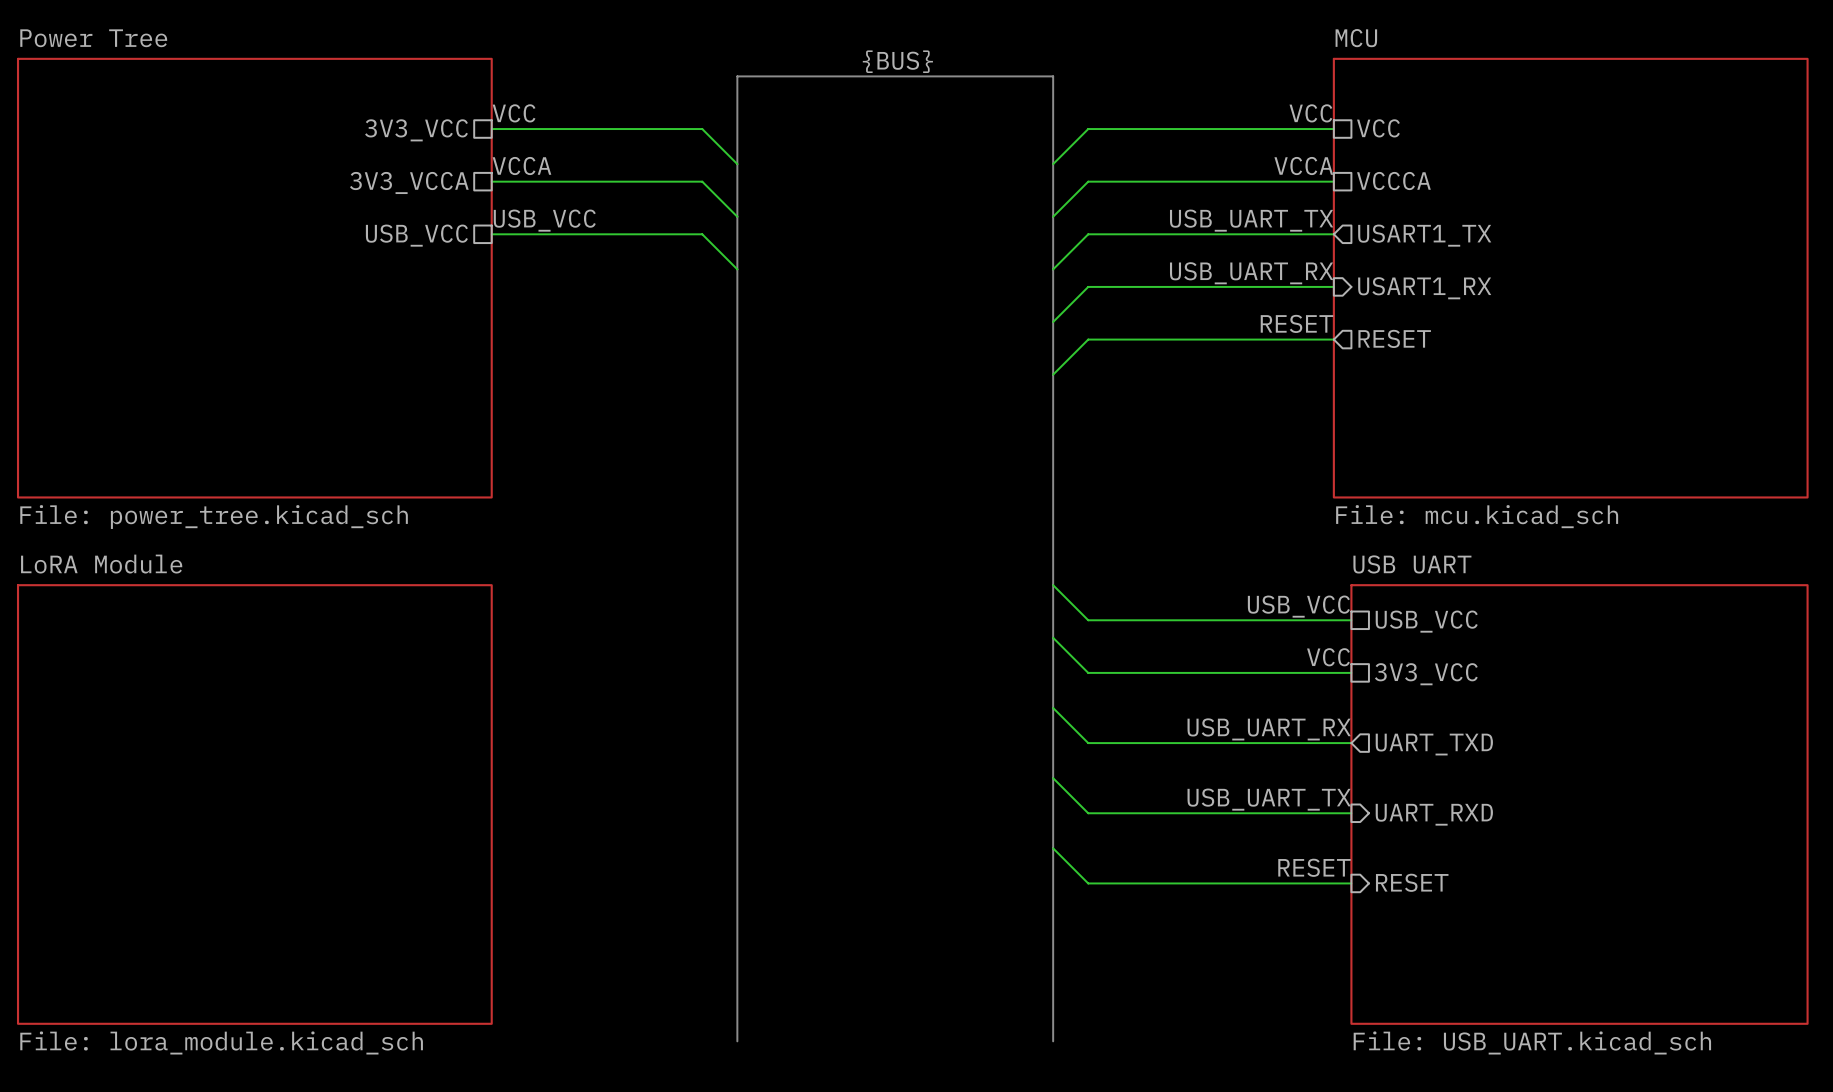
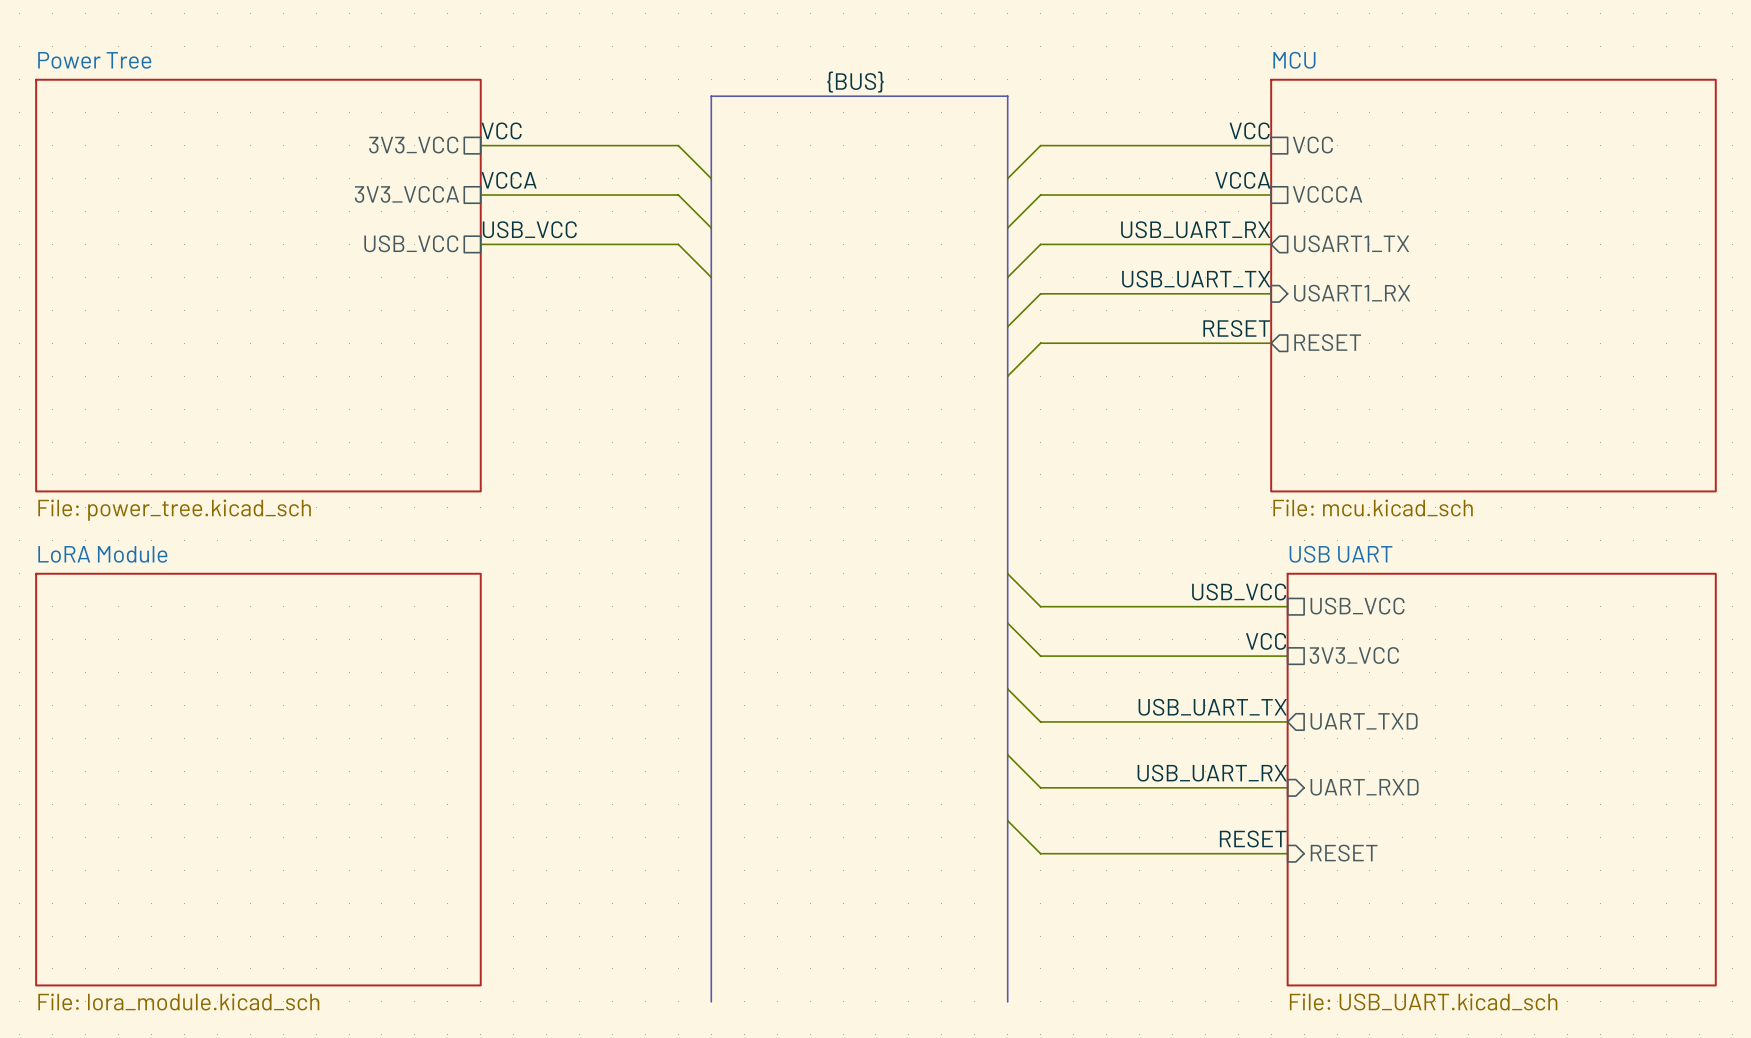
label: USB_UART_TX (1251, 220) -> USB_UART_RX (1195, 229)
label: USB_UART_RX (1251, 273) -> USB_UART_TX (1196, 279)
label: USB_UART_RX (1269, 729) -> USB_UART_TX (1212, 707)
label: USB_UART_TX (1269, 799) -> USB_UART_RX (1212, 773)

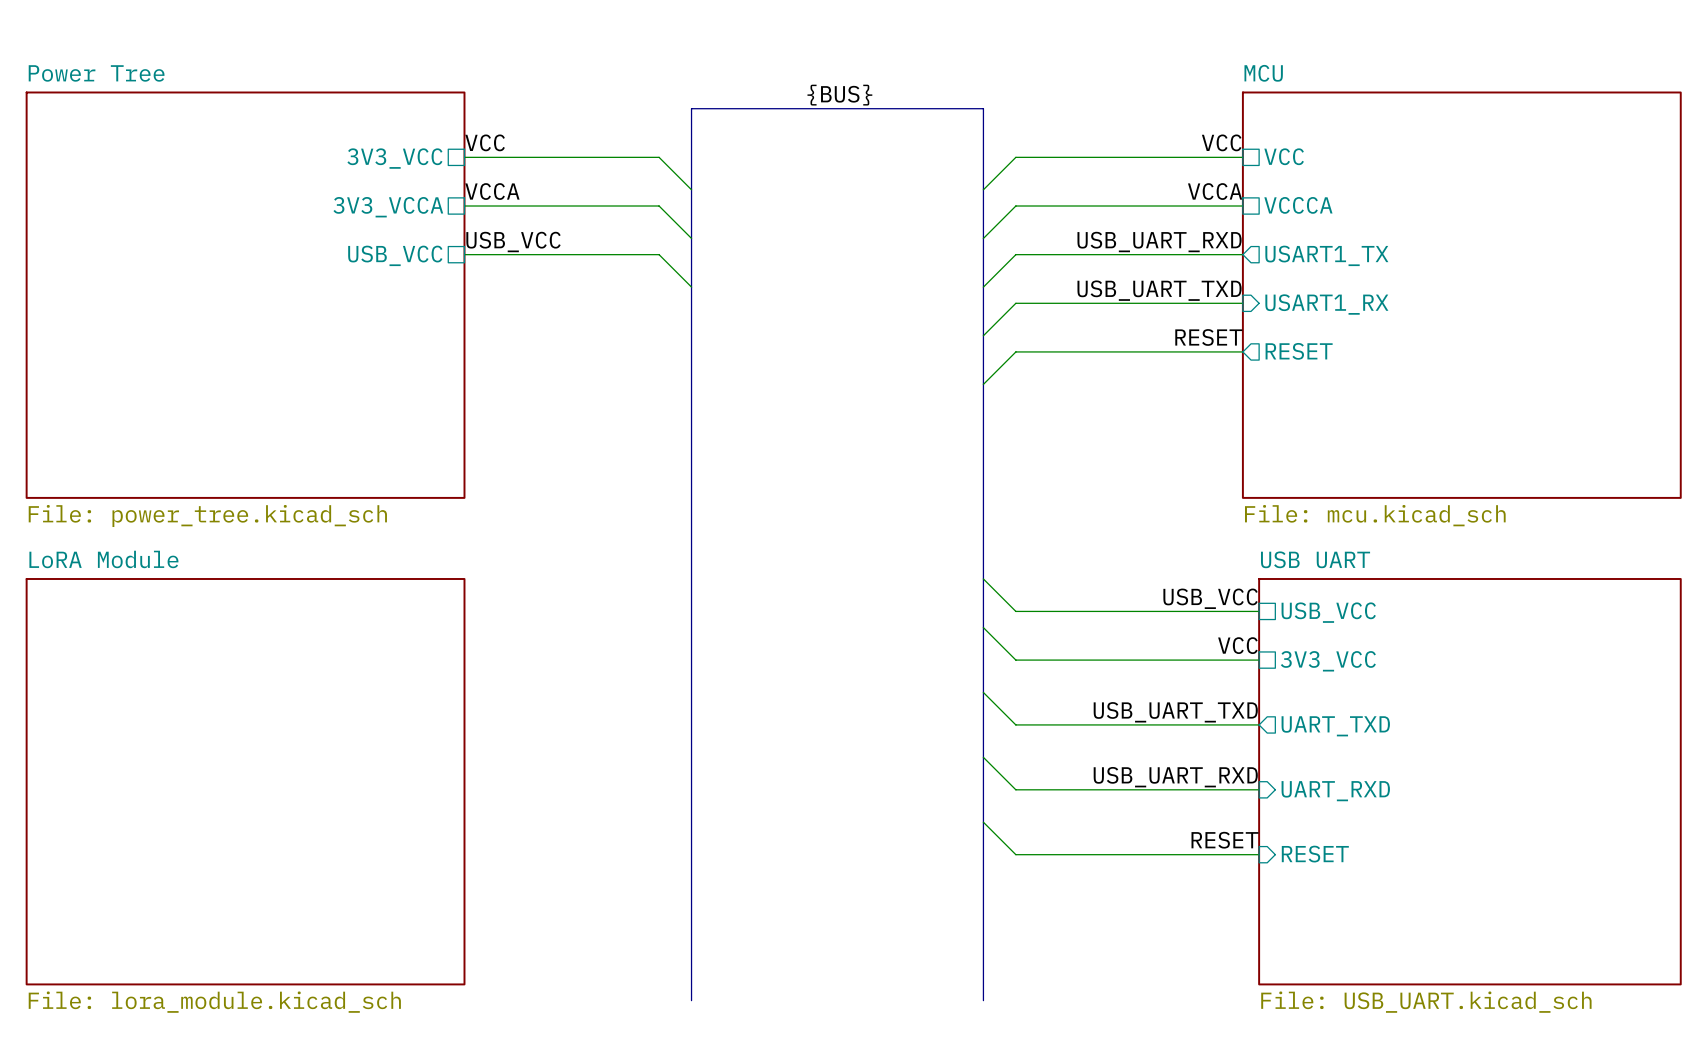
label: USB_UART_RX (1195, 229) -> USB_UART_RXD (1159, 242)
label: USB_UART_TX (1196, 279) -> USB_UART_TXD (1159, 290)
label: USB_UART_TX (1212, 707) -> USB_UART_TXD (1175, 712)
label: USB_UART_RX (1212, 773) -> USB_UART_RXD (1175, 777)

